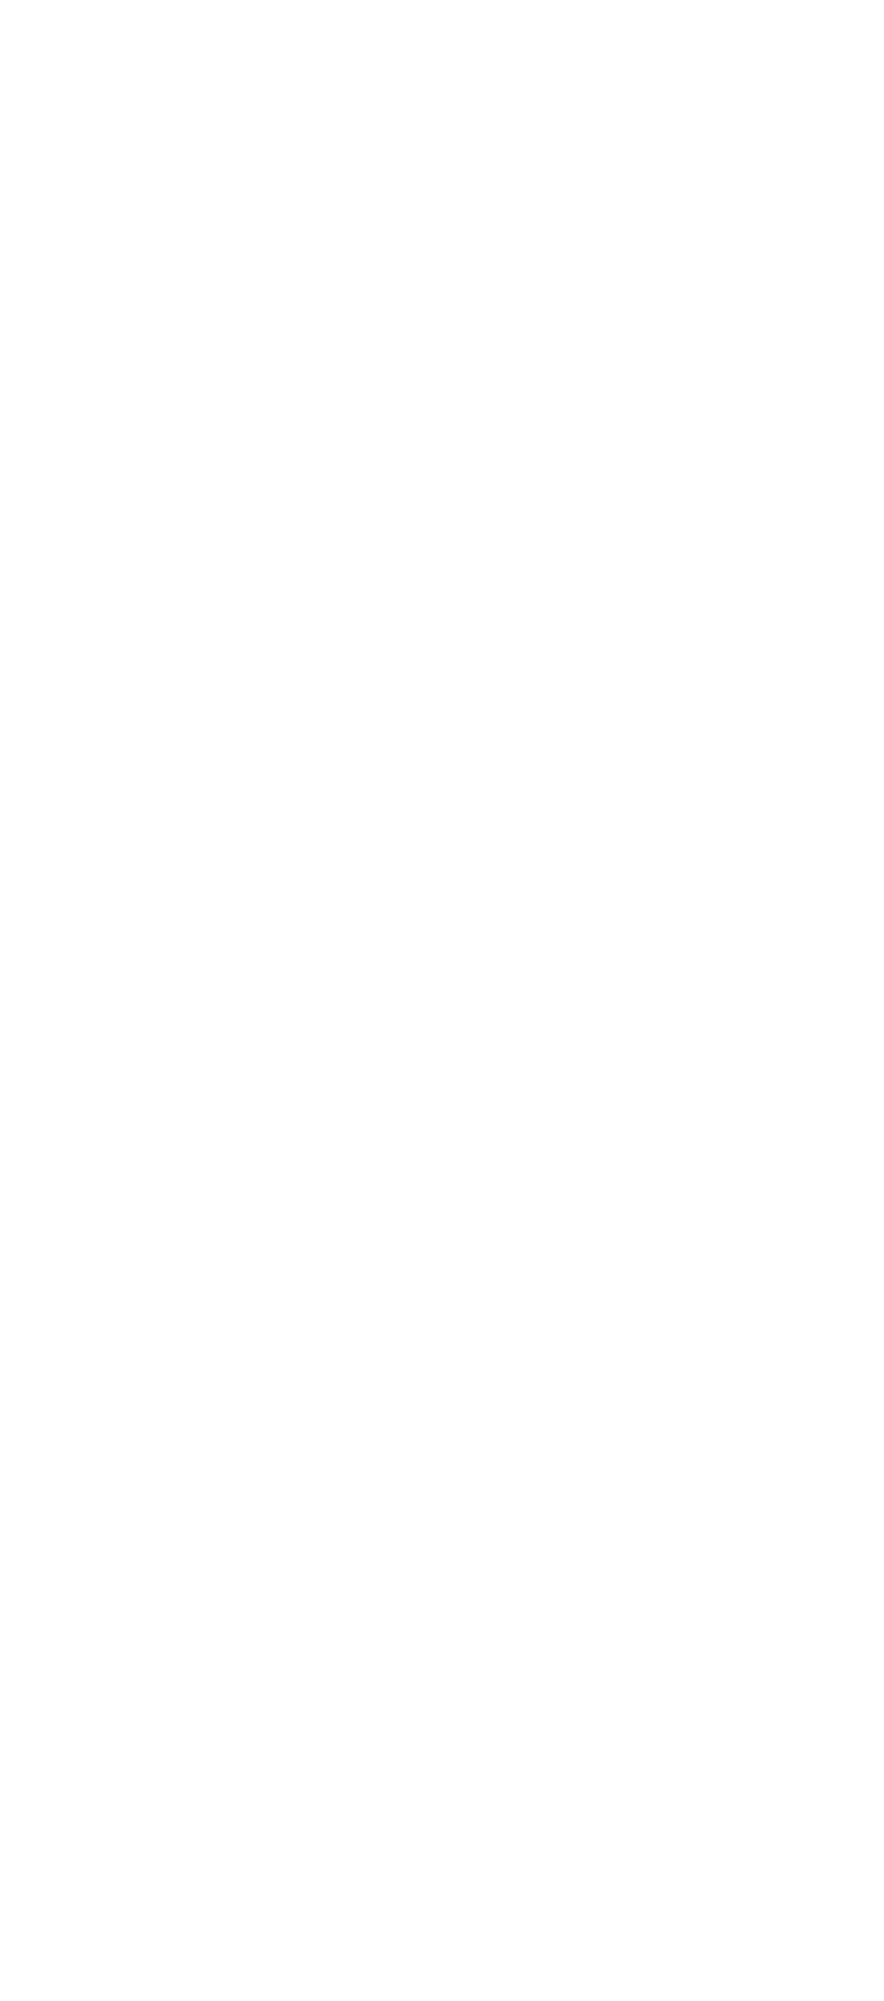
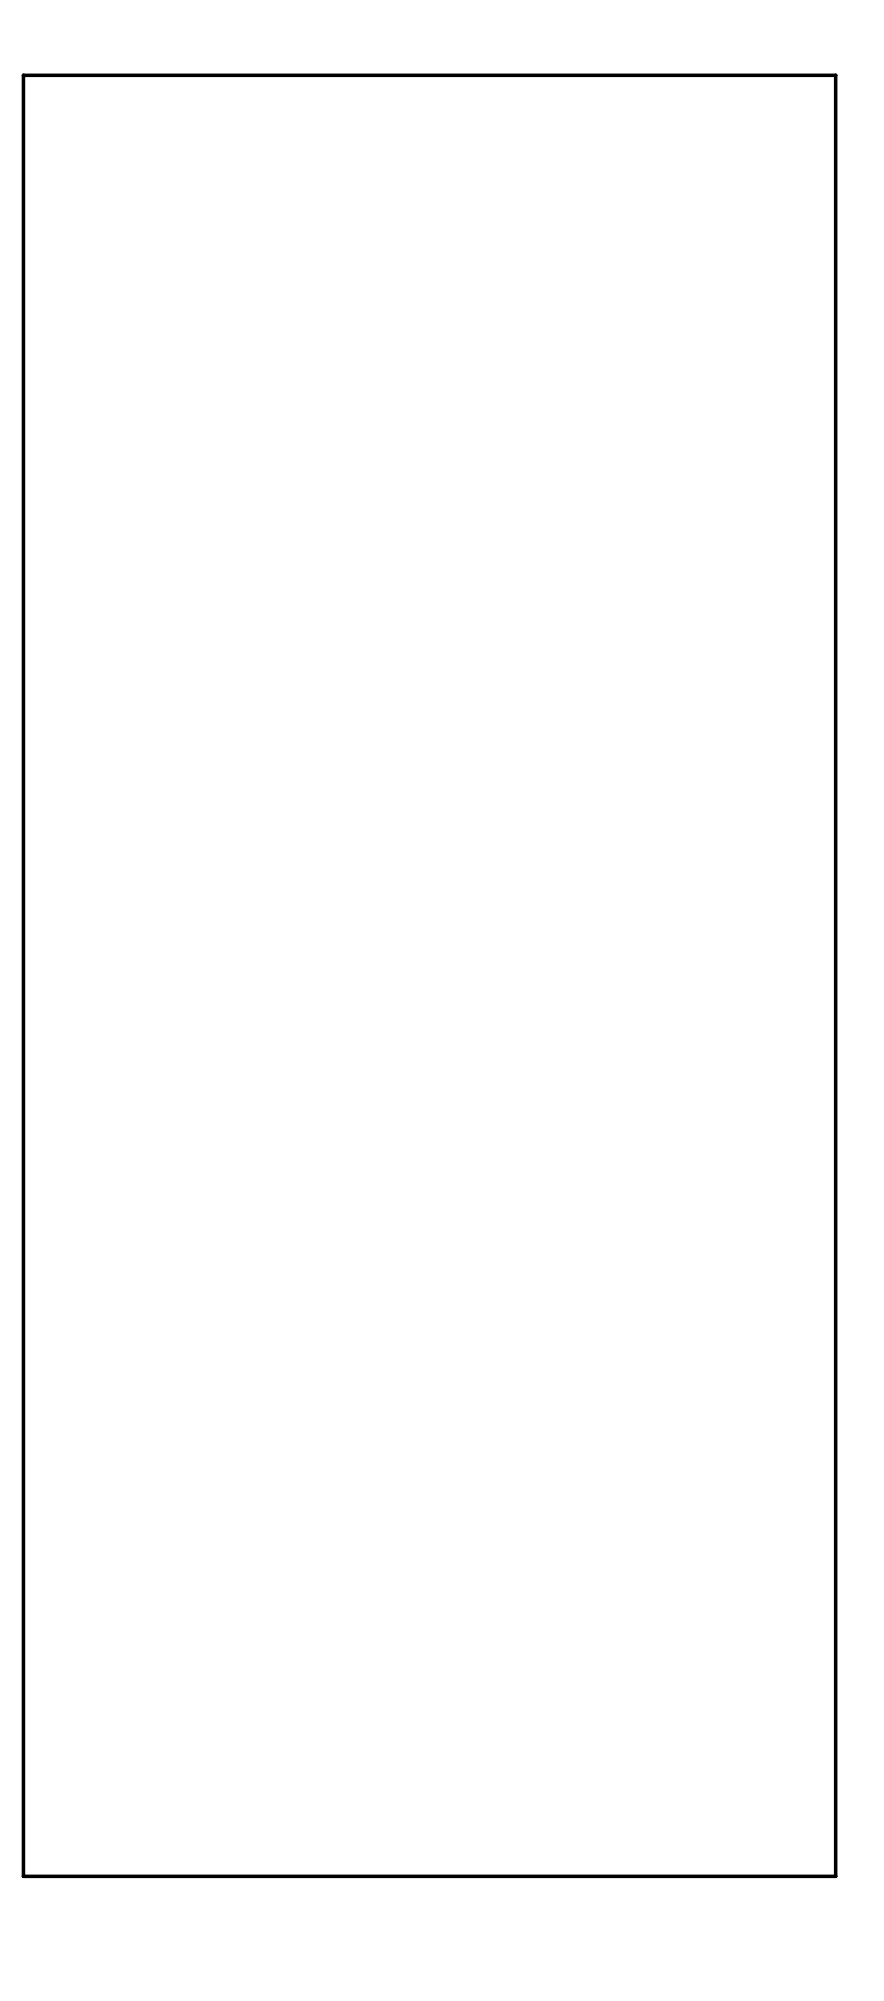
board edge: none -> (23, 75) (835, 75) (835, 1876) (23, 1876) (23, 75)

